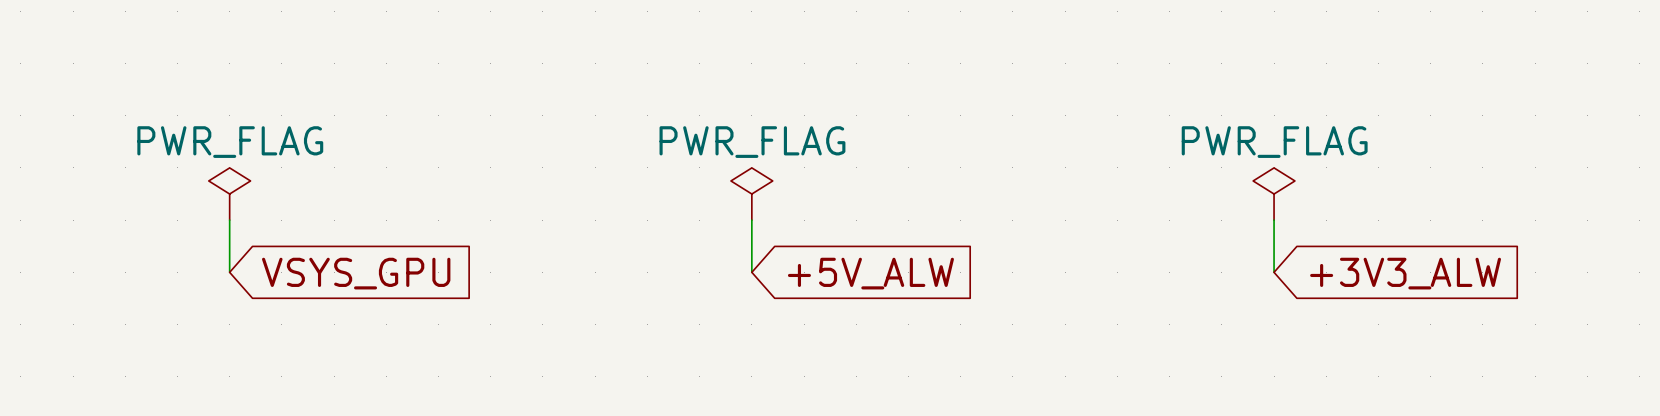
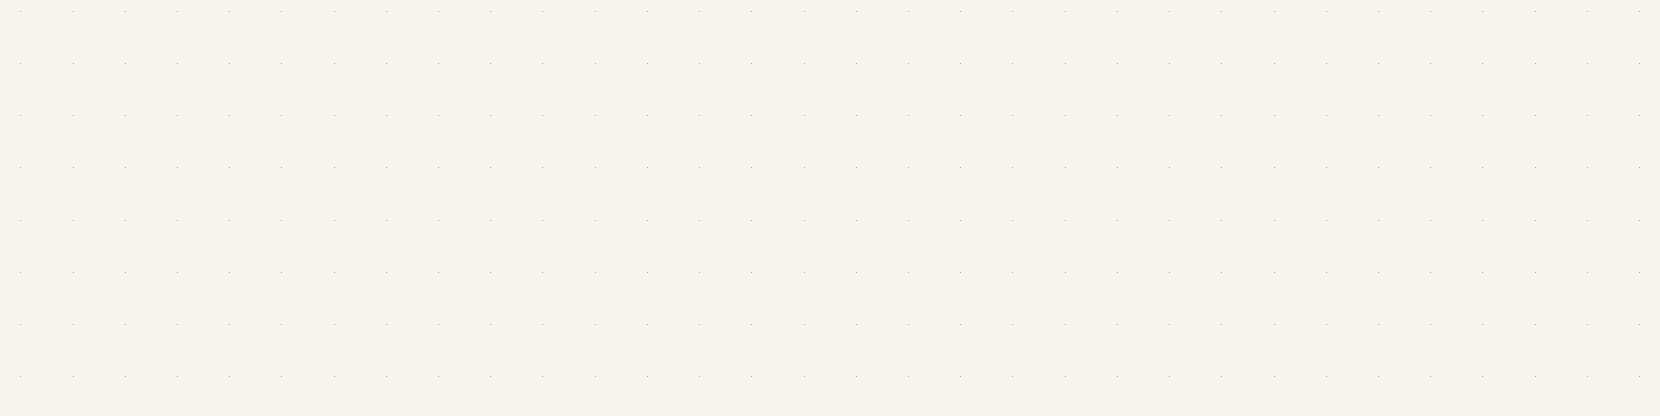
power symbol: PWR_FLAG (229, 194) -> none
power symbol: PWR_FLAG (751, 194) -> none
power symbol: PWR_FLAG (1274, 194) -> none
wire: (229, 220) (229, 272) -> none
wire: (751, 220) (751, 272) -> none
wire: (1274, 220) (1274, 272) -> none
global label: VSYS_GPU (356, 273) -> none
global label: +5V_ALW (870, 273) -> none
global label: +3V3_ALW (1405, 273) -> none

